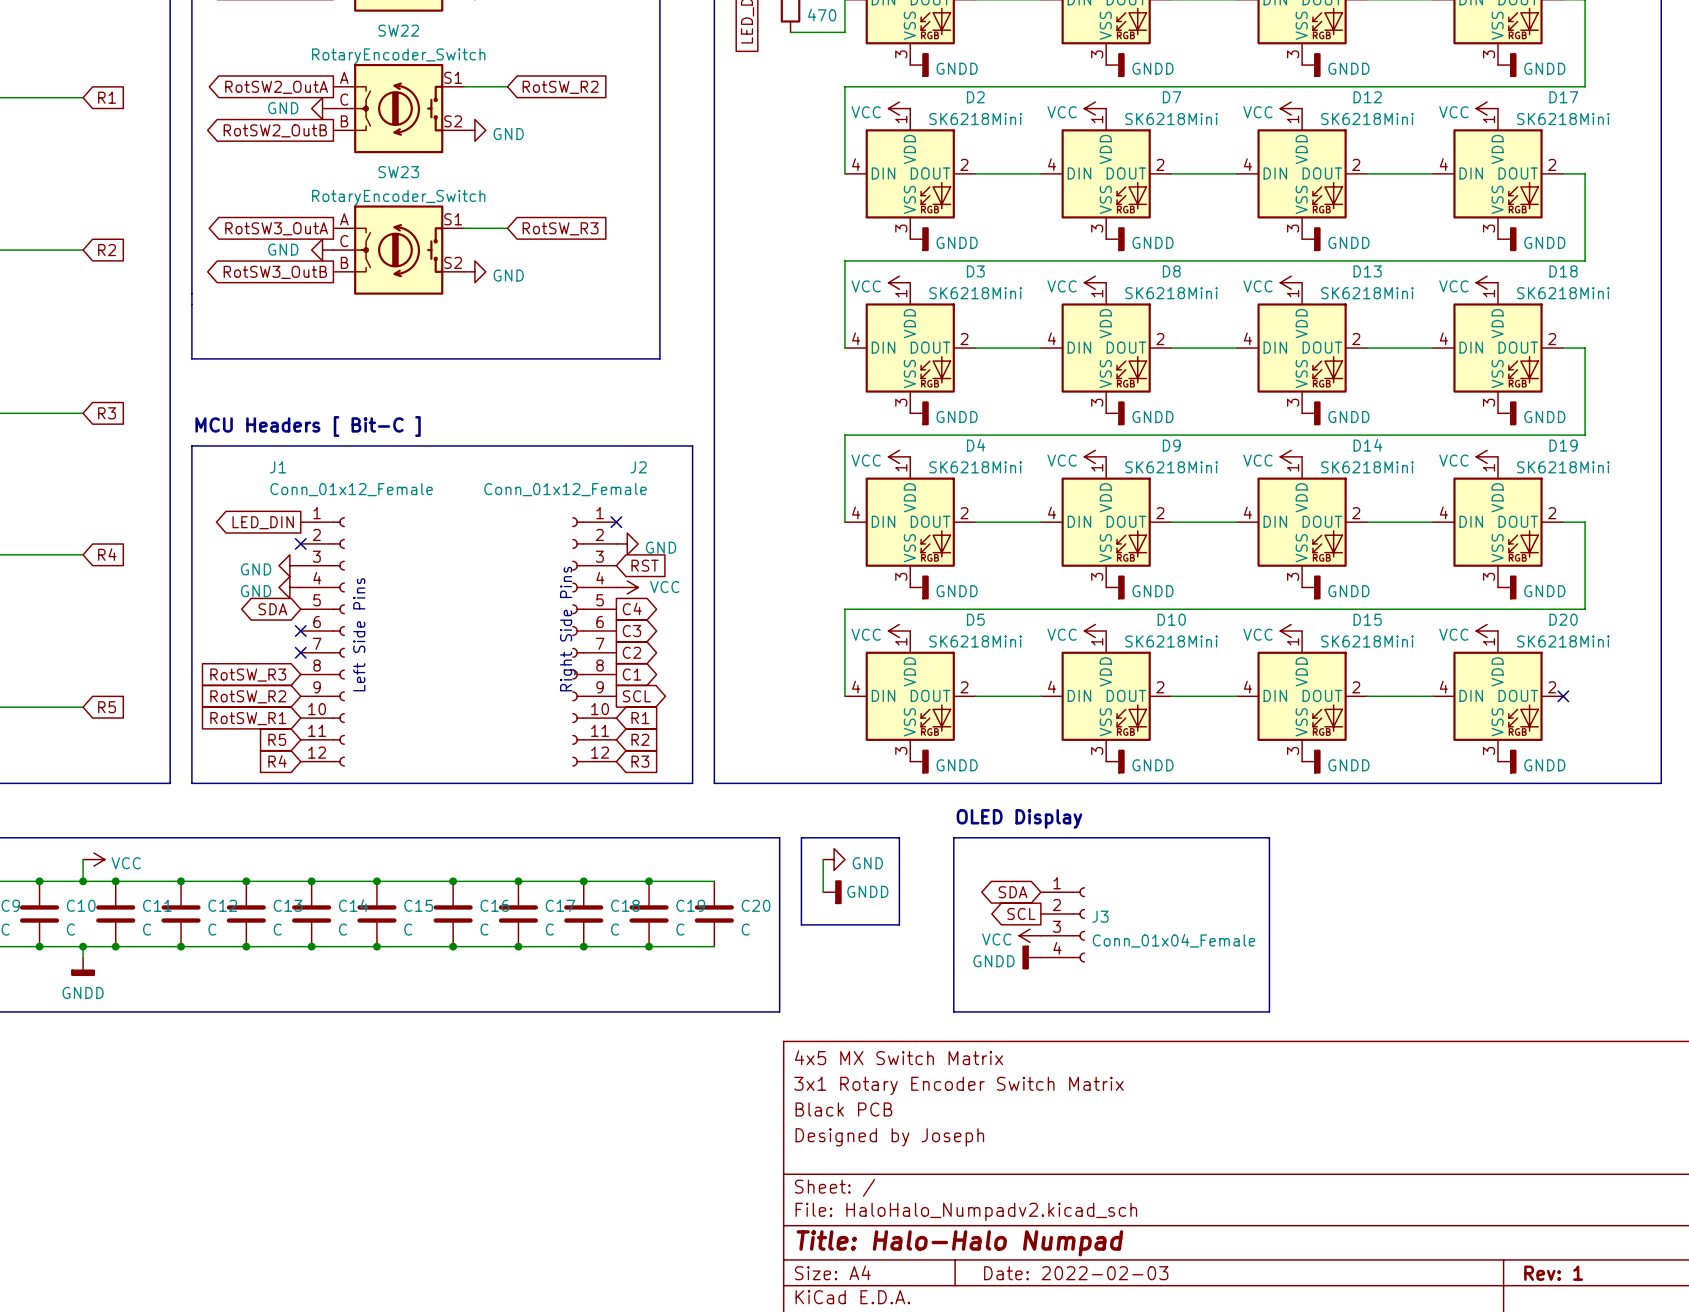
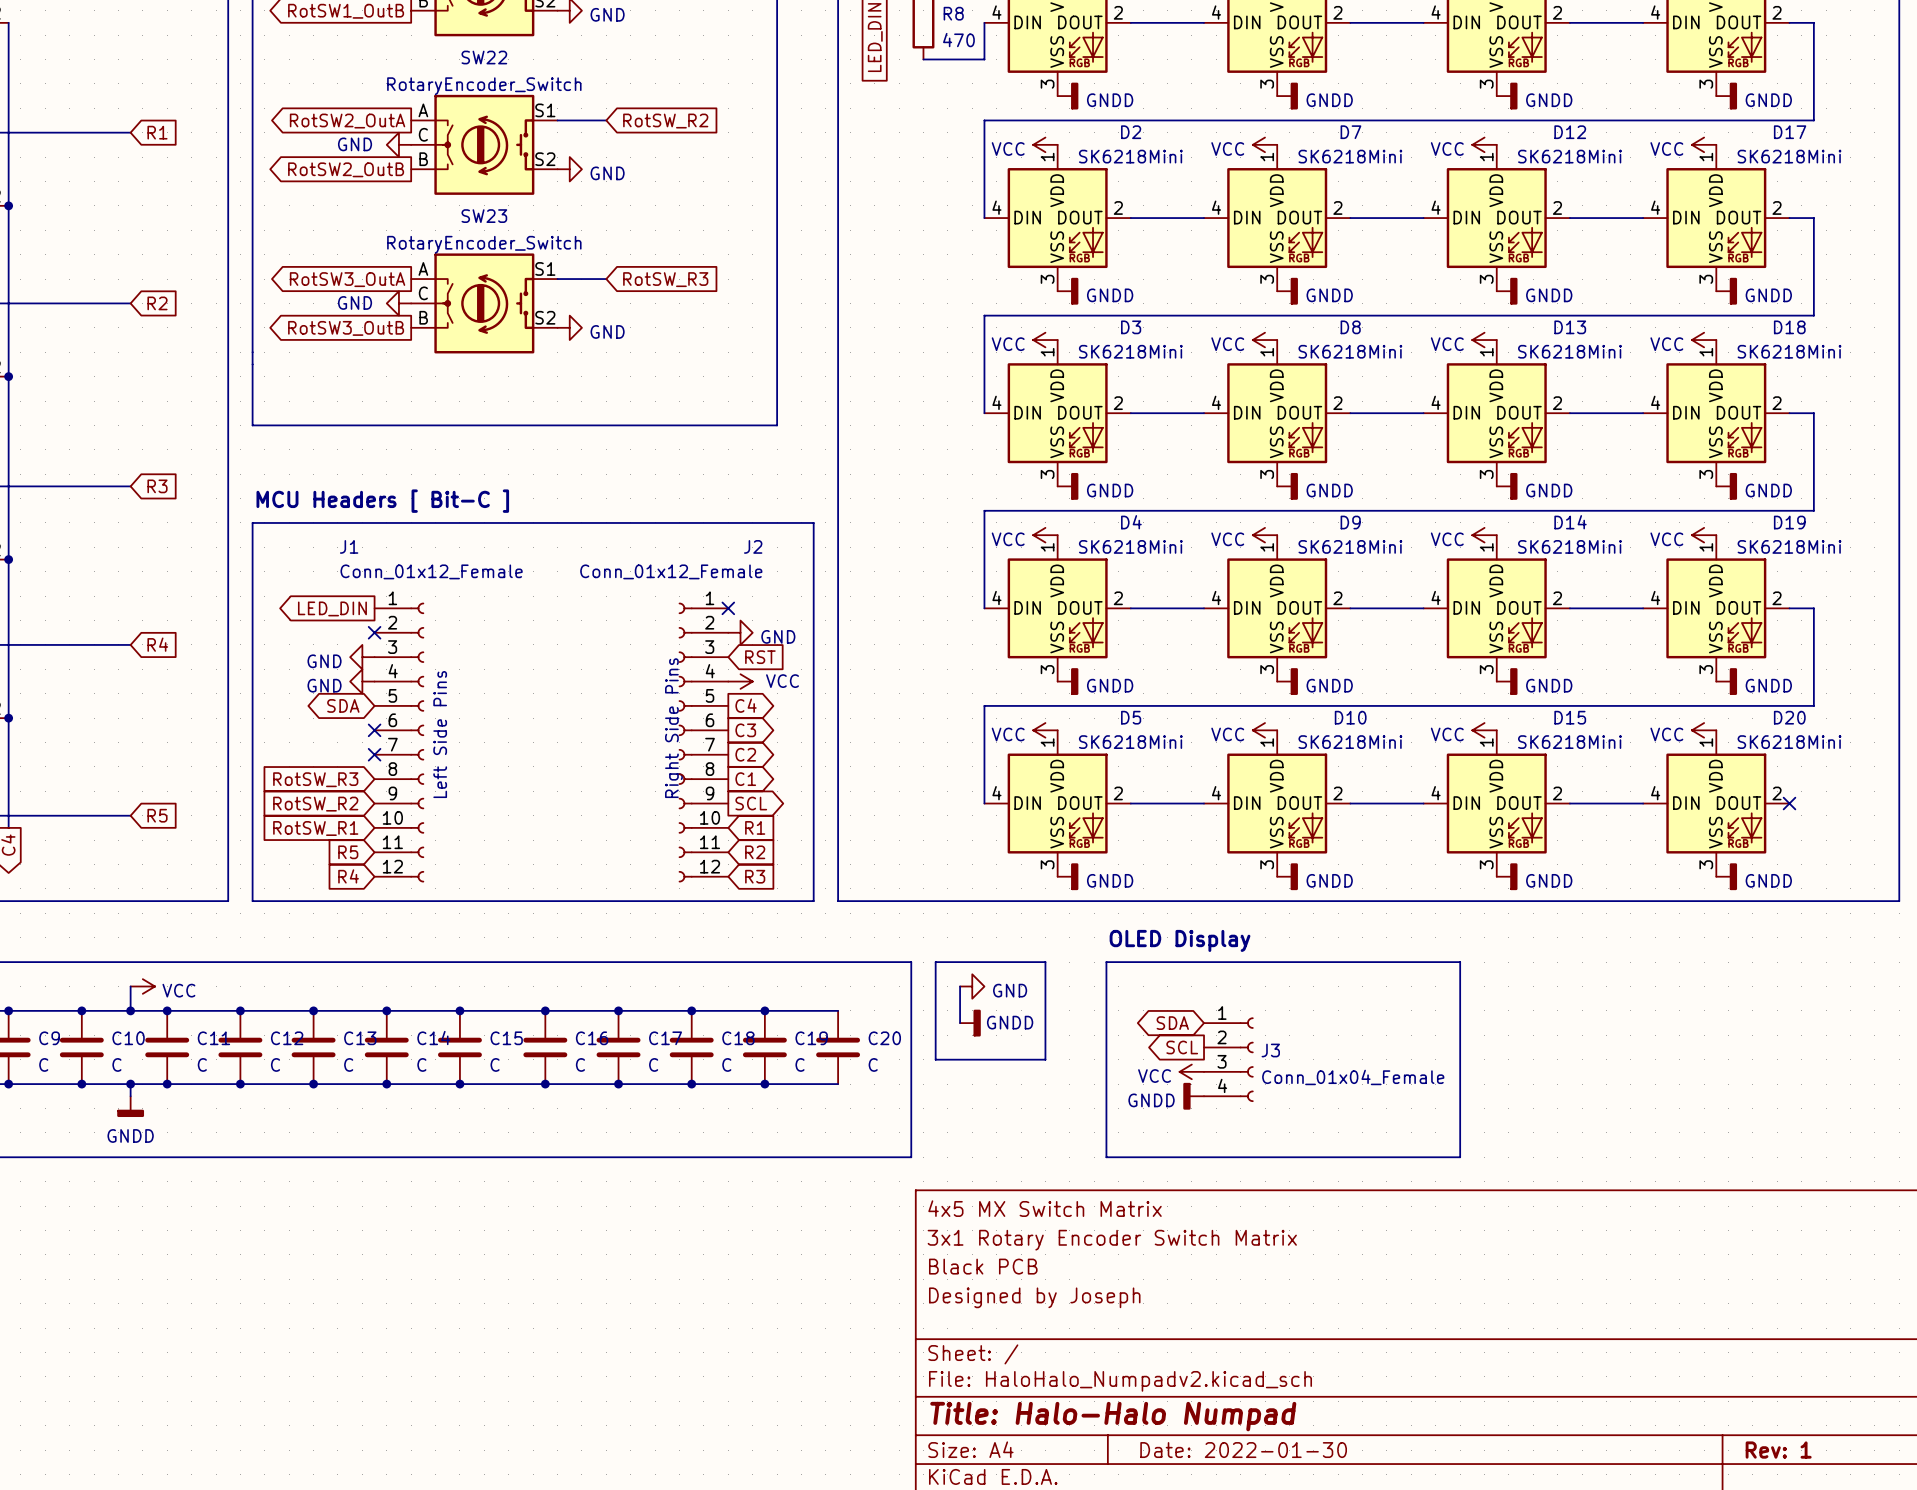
title block: Date: 2022-02-03 (1076, 1273) -> Date: 2022-01-30 (1243, 1450)

